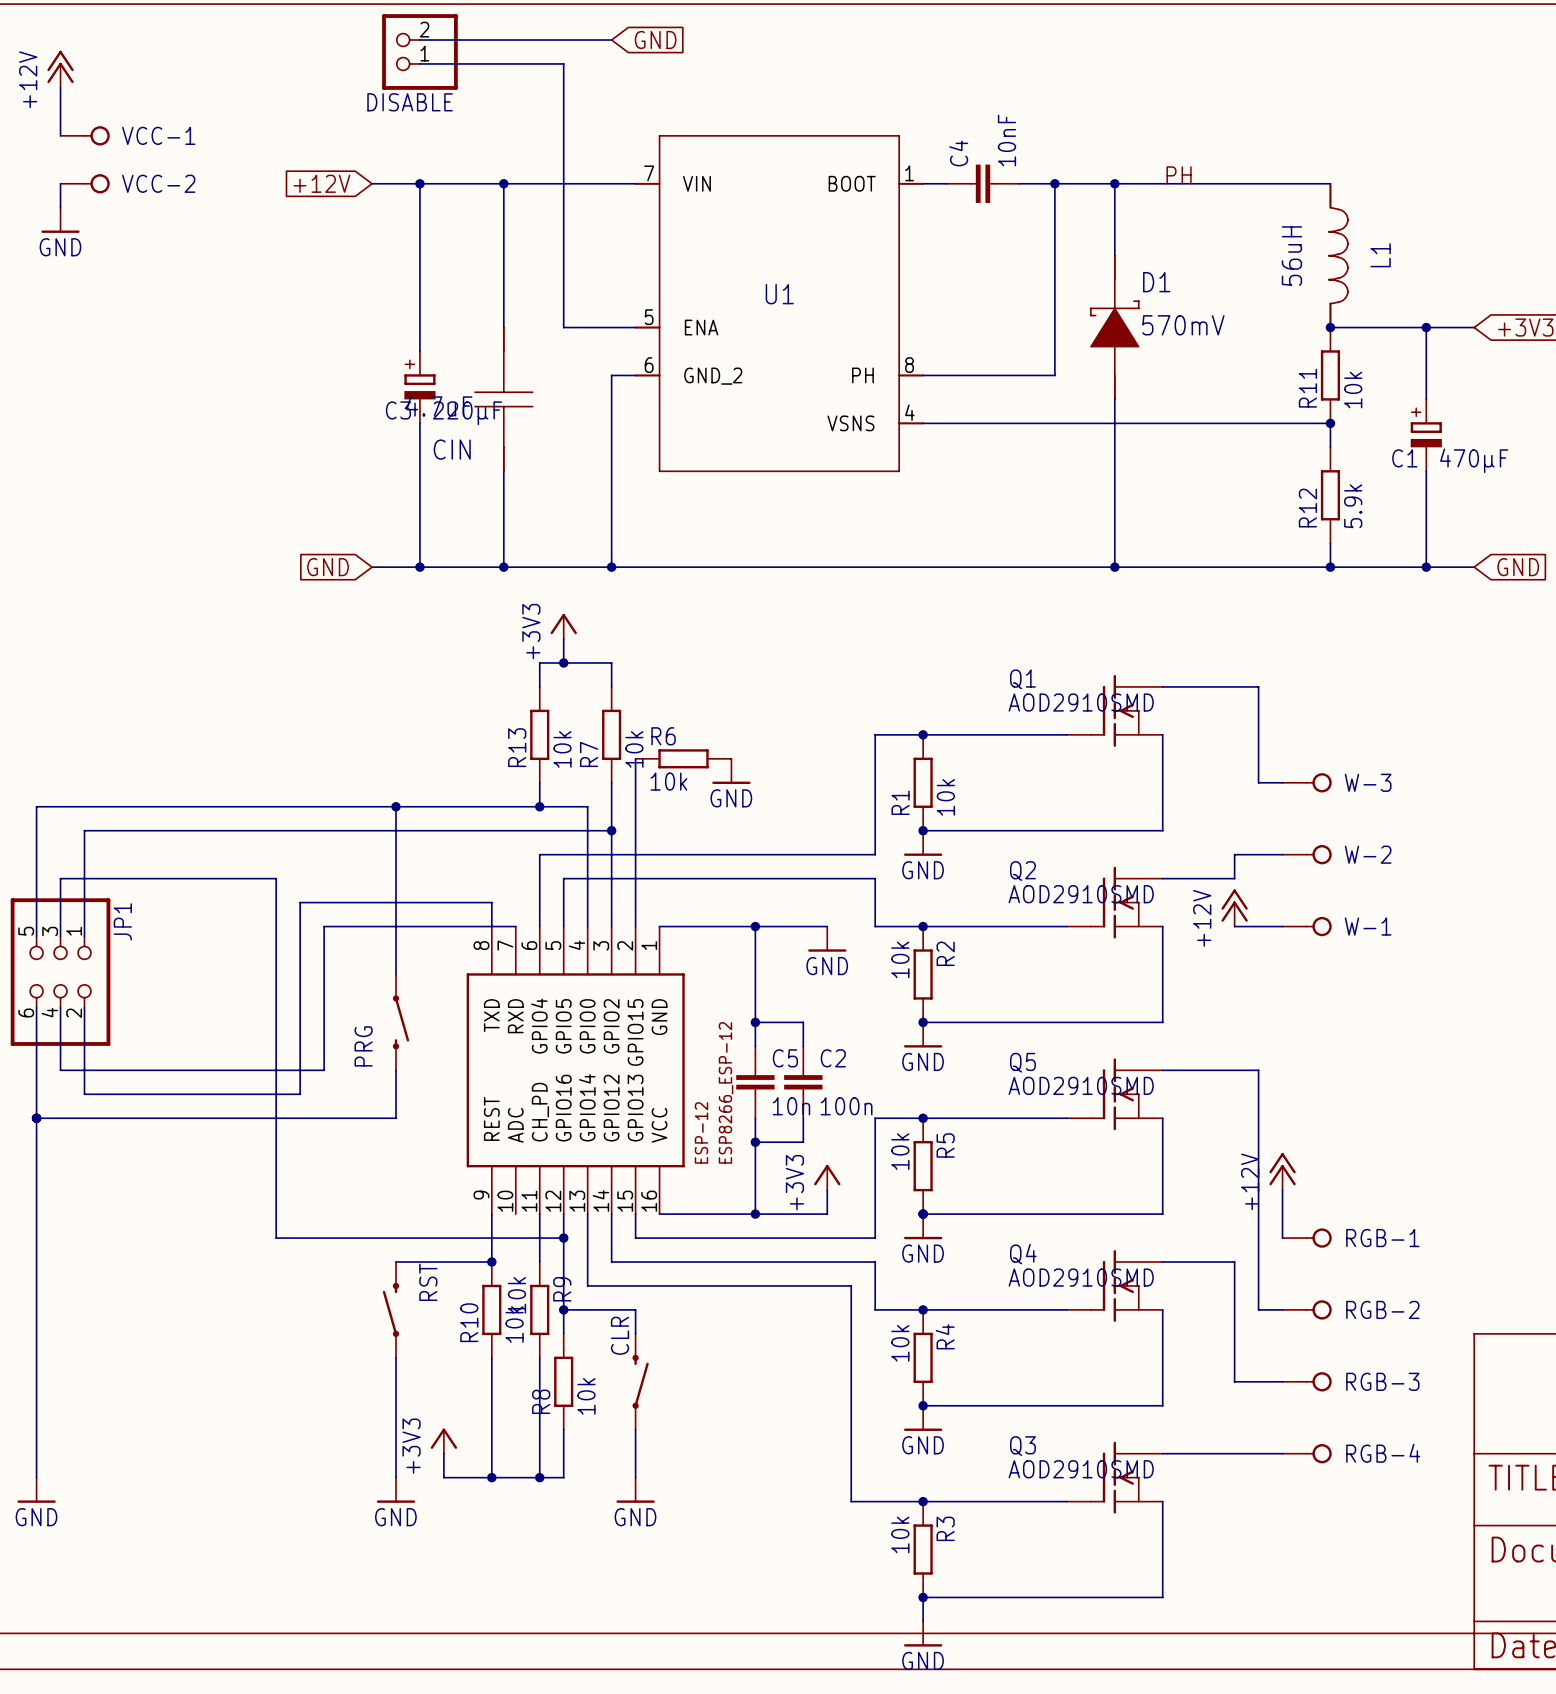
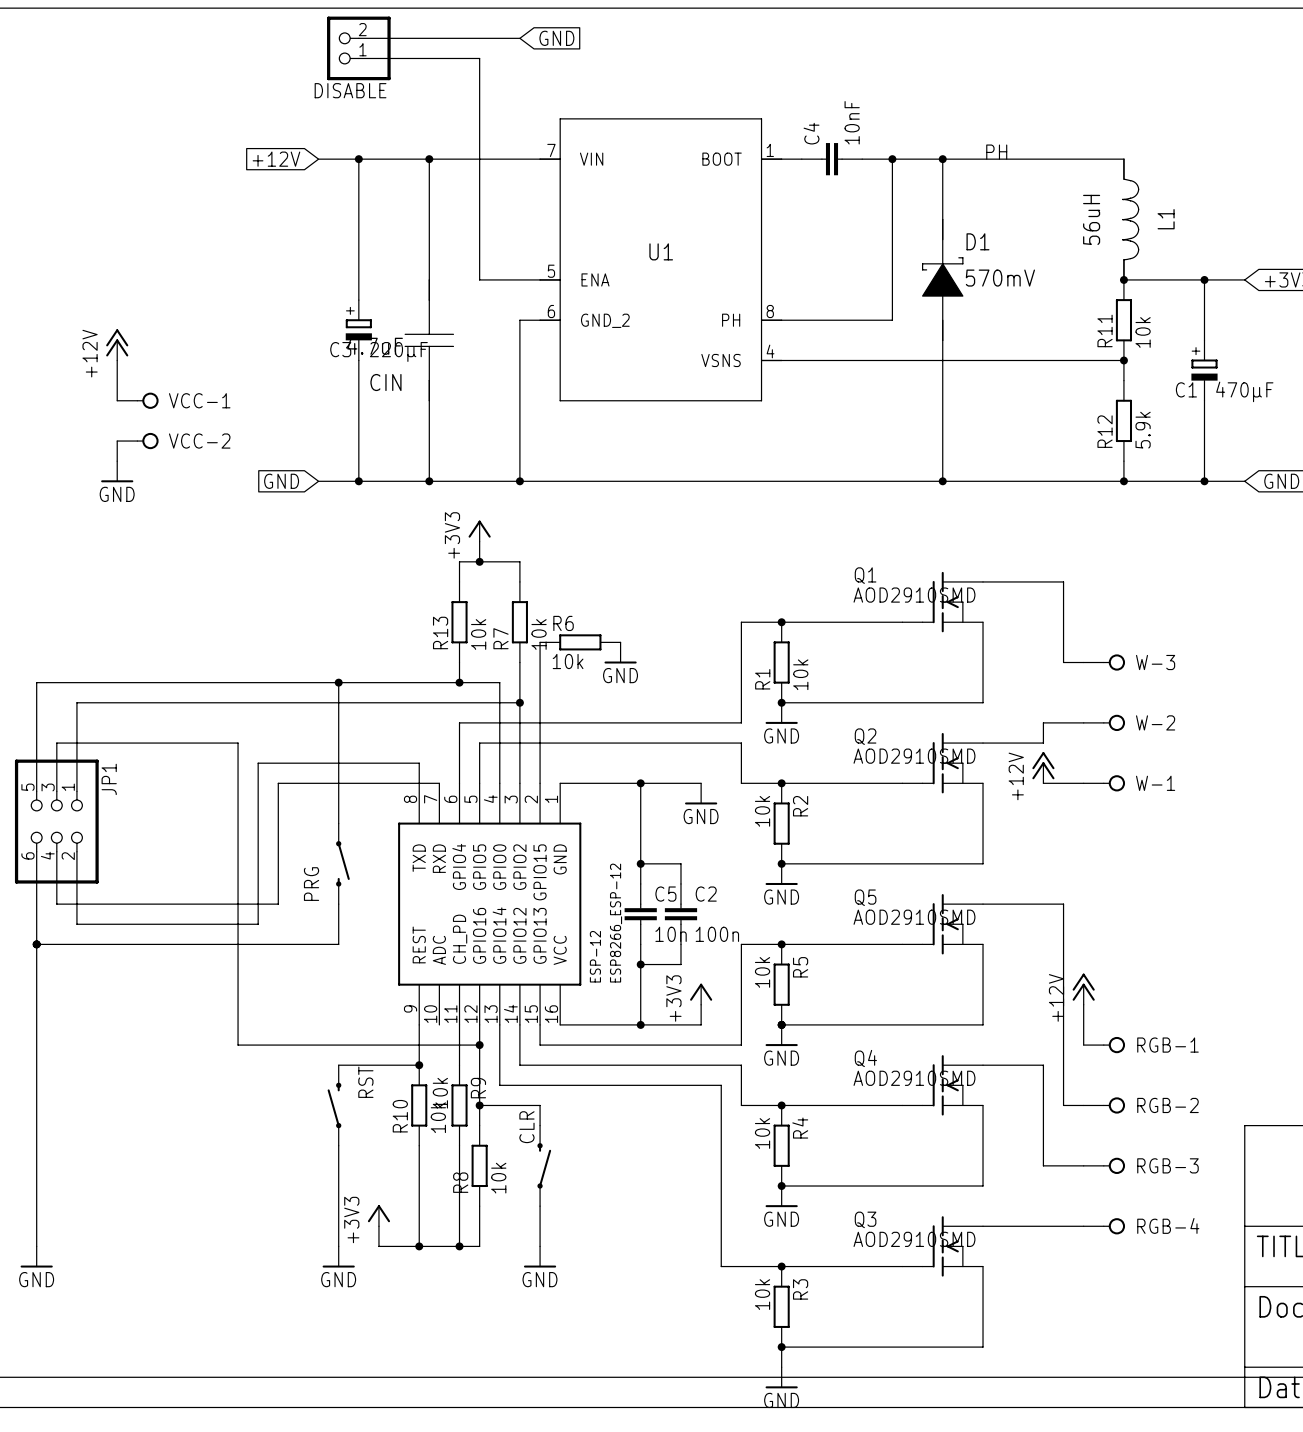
power symbol: +12V (60, 69) -> none
wire: (60, 87) (60, 135) -> none
VCC-1 position: (85, 135) -> (137, 400)
wire: (60, 183) (60, 207) -> none
VCC-2 position: (85, 183) -> (137, 441)
power symbol: GND (60, 220) -> none
power symbol: none -> +12V (117, 344)
wire: none -> (117, 360) (117, 400)
wire: none -> (117, 441) (117, 461)
power symbol: none -> GND (117, 471)

